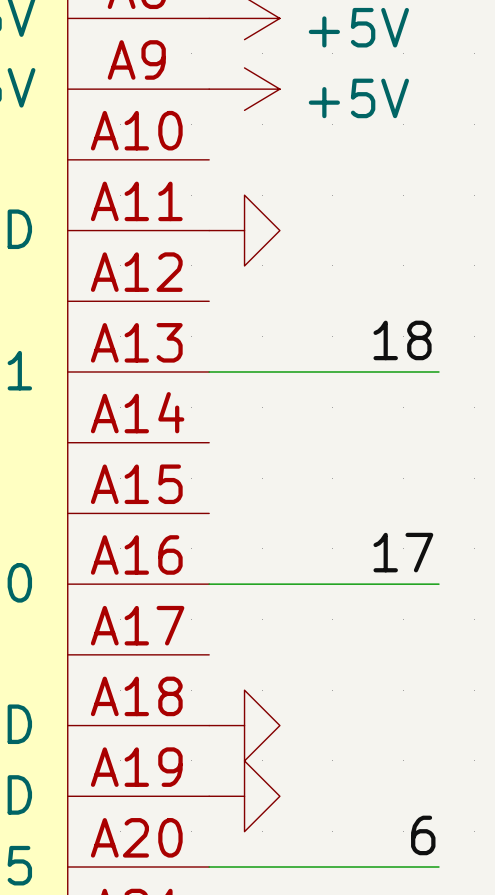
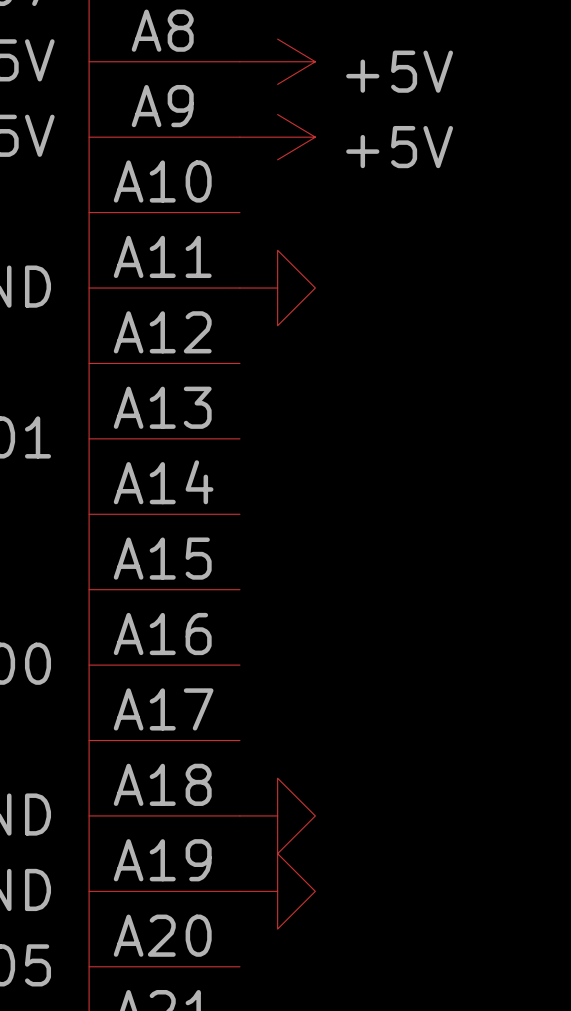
label: 18 (402, 340) -> none
wire: (209, 371) (439, 371) -> none
label: 17 (403, 552) -> none
wire: (209, 584) (439, 584) -> none
label: 6 (423, 835) -> none
wire: (209, 867) (439, 867) -> none

